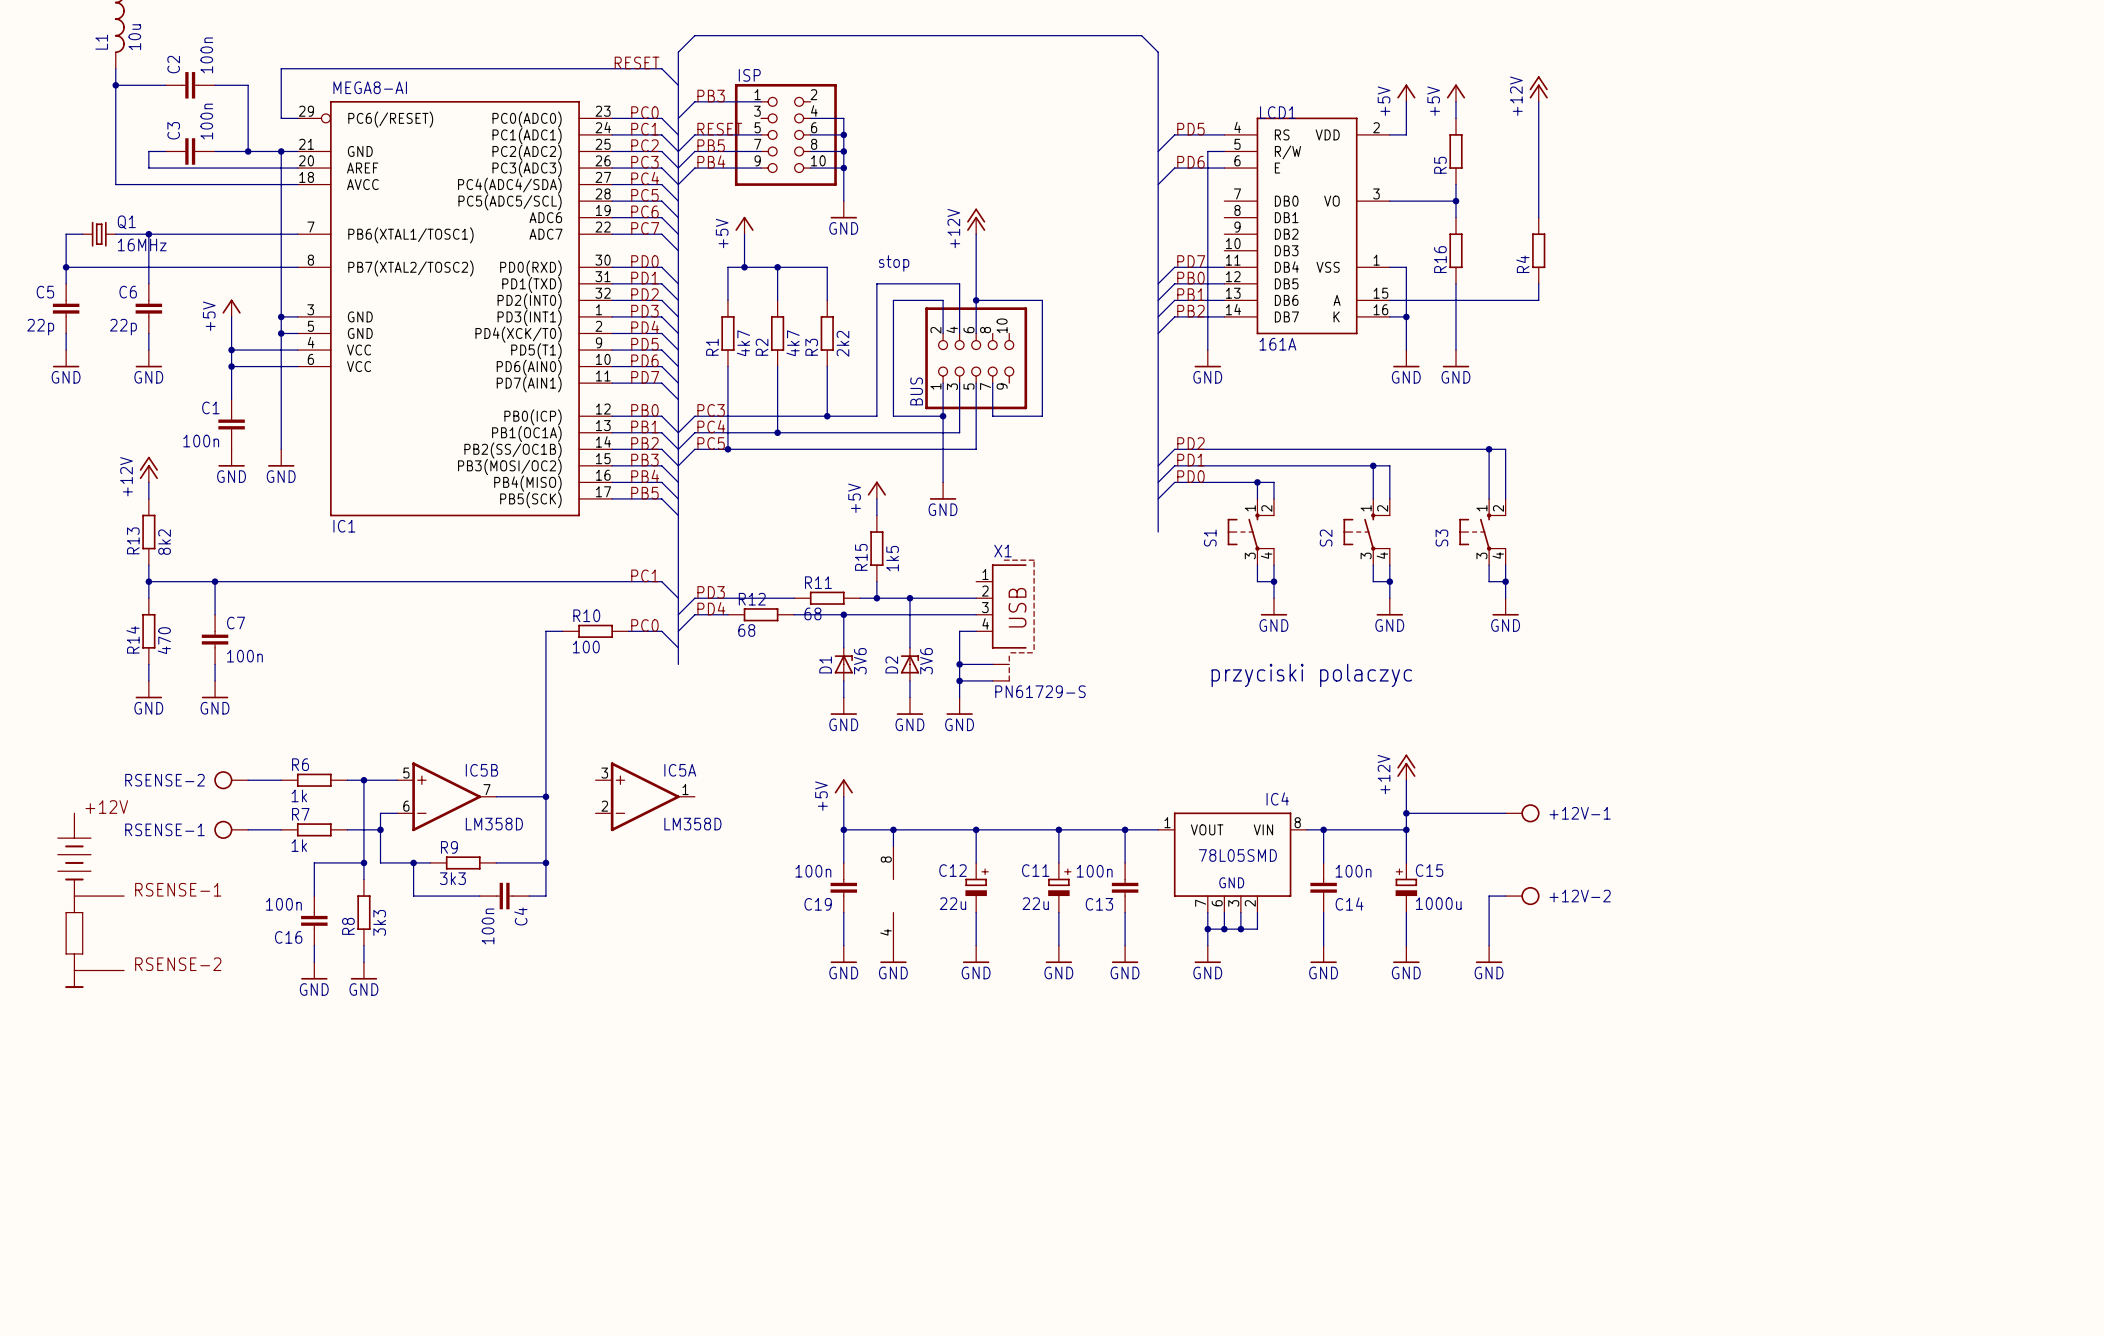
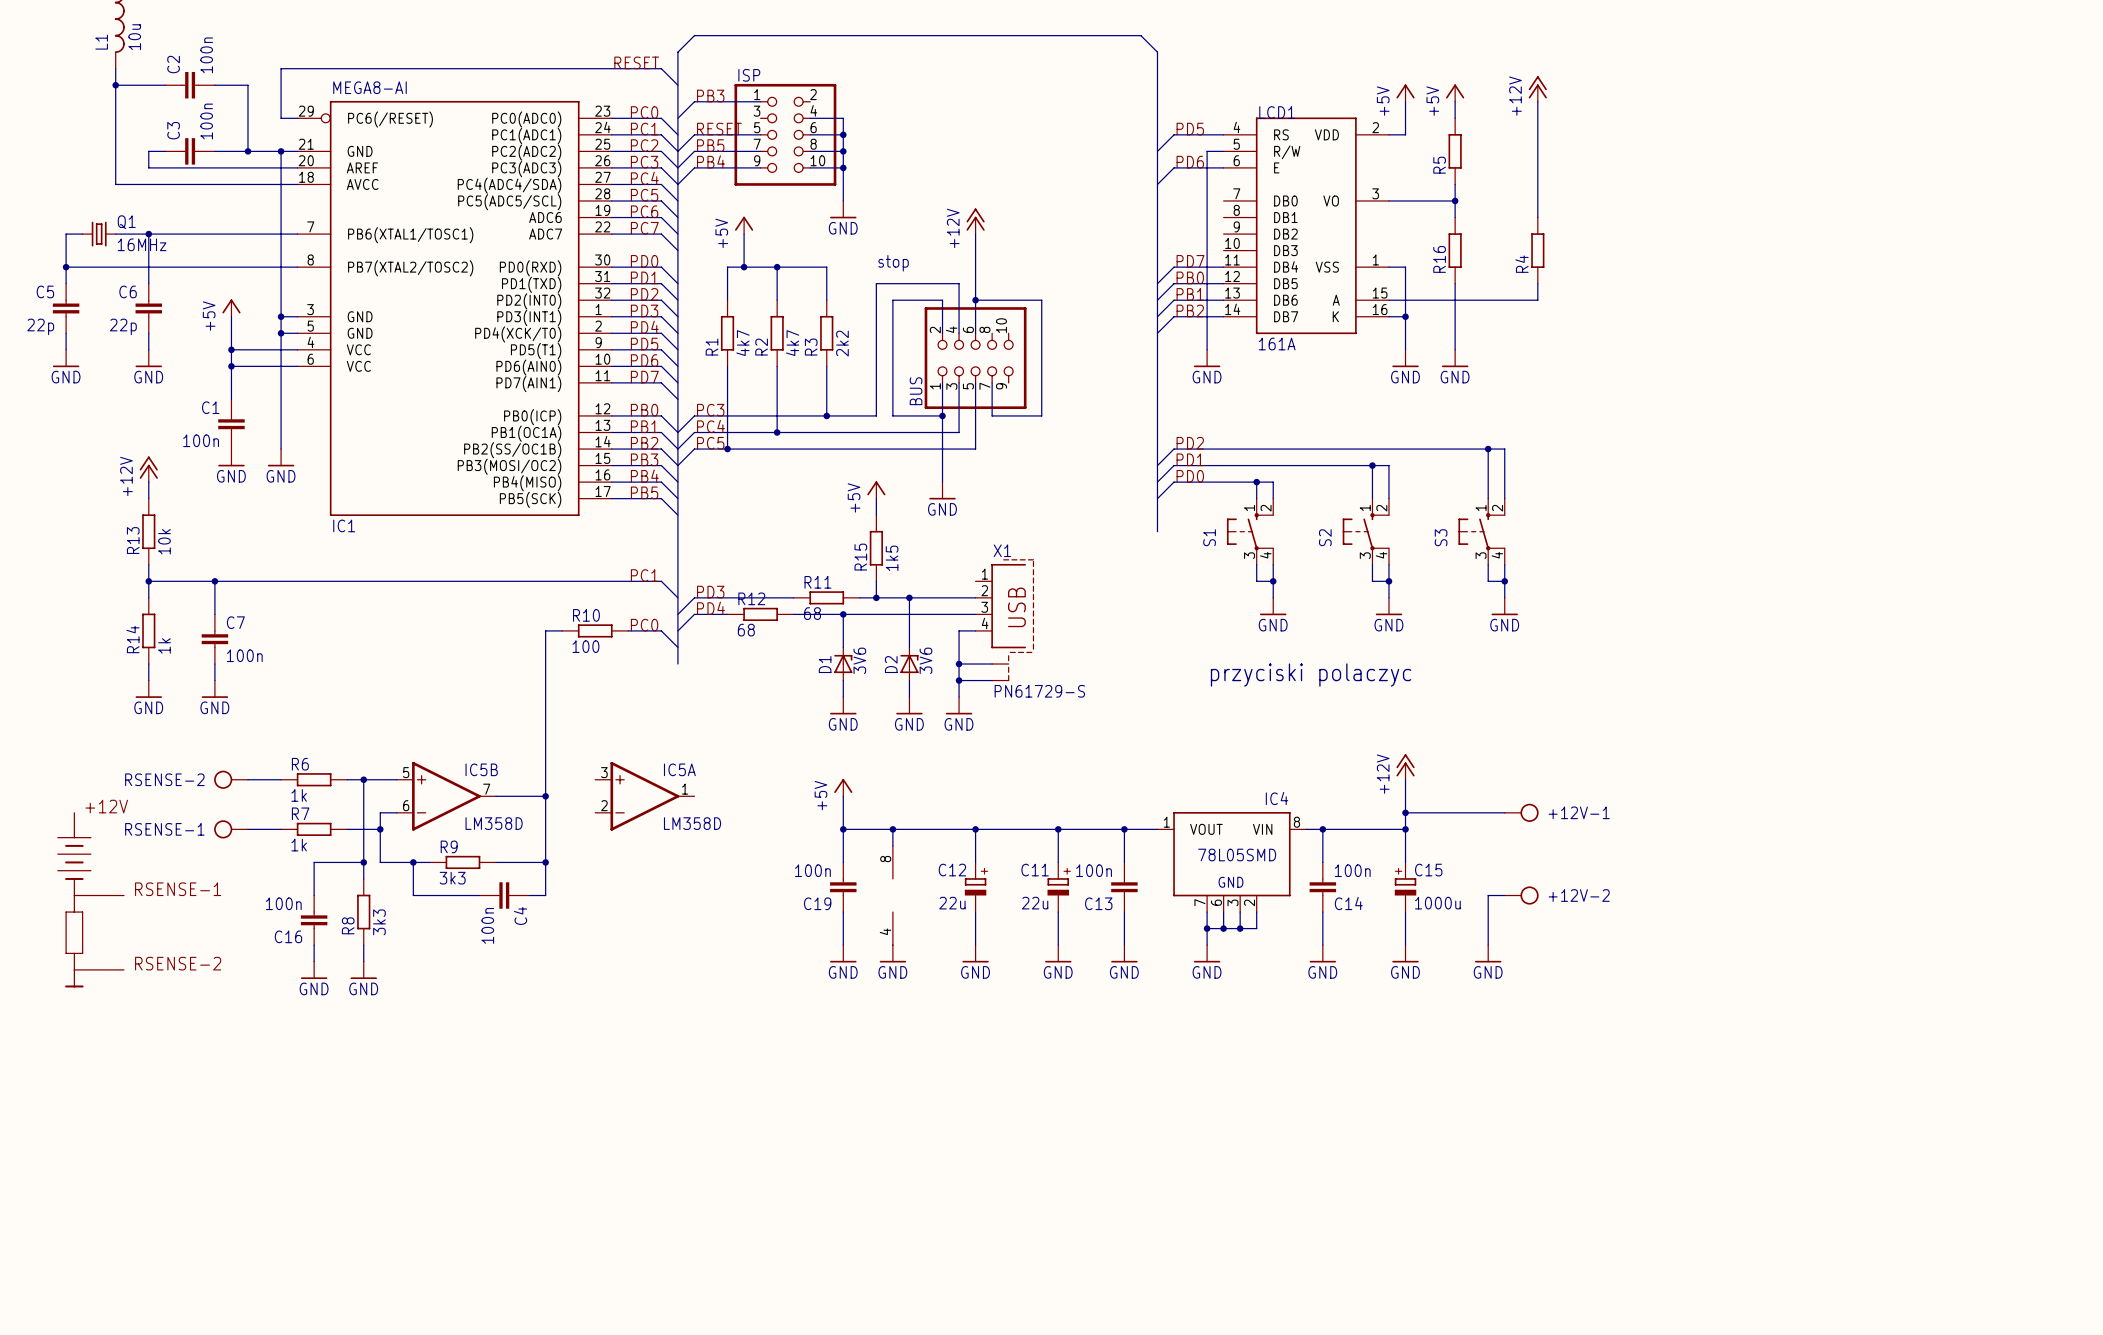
R13 value: 8k2 (164, 542) -> 10k (164, 541)
R14 value: 470 (164, 640) -> 1k (164, 645)

